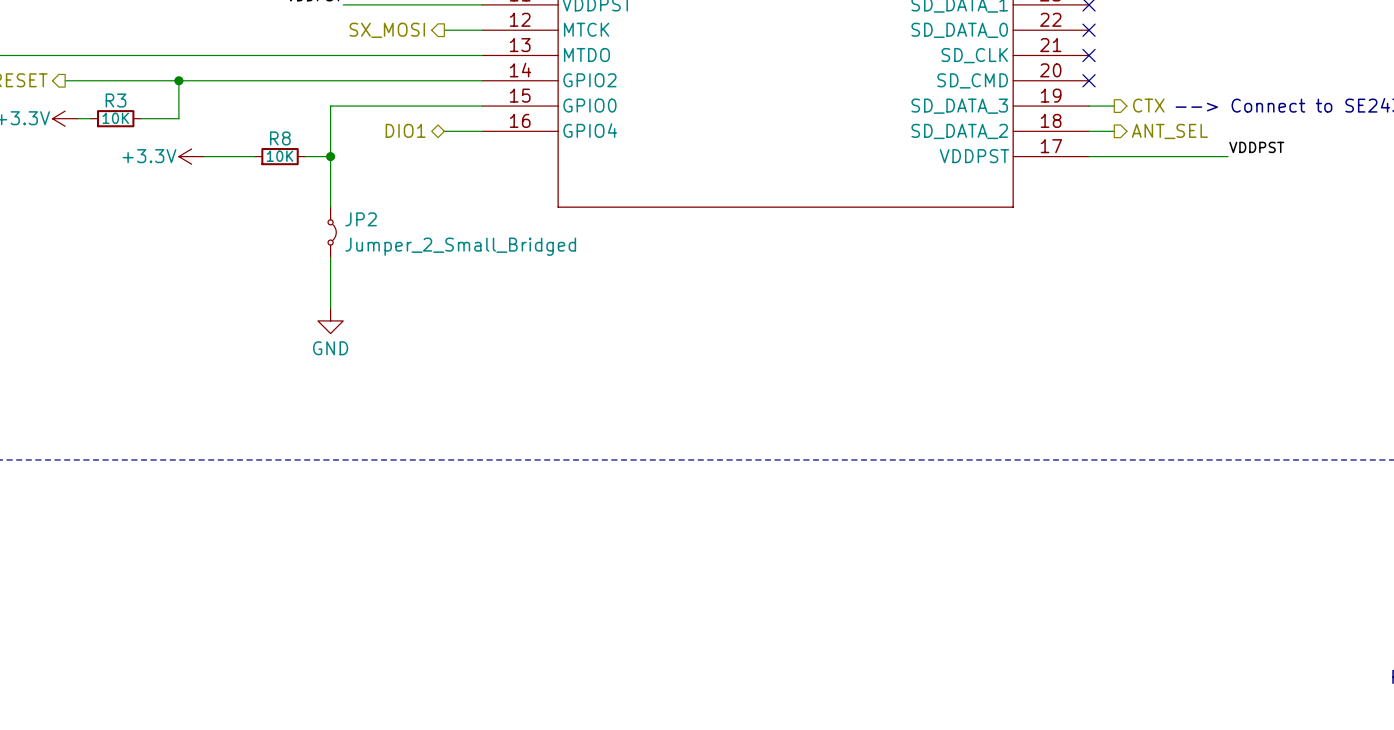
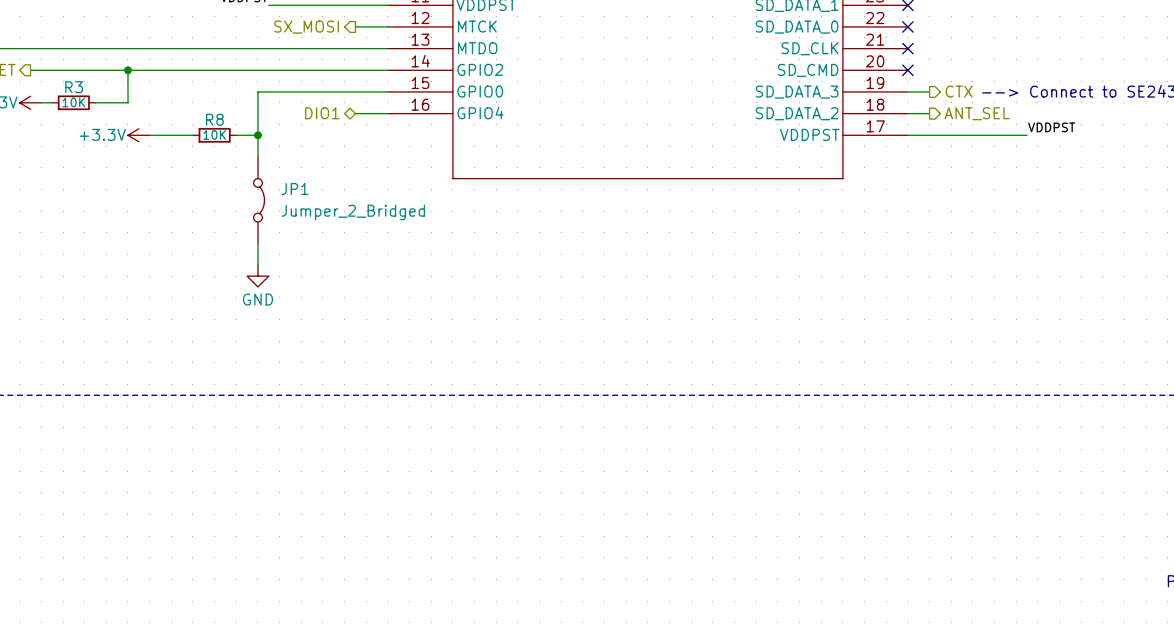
JP1: none -> Jumper_2_Bridged (259, 200)
JP2: Jumper_2_Small_Bridged (332, 232) -> none

